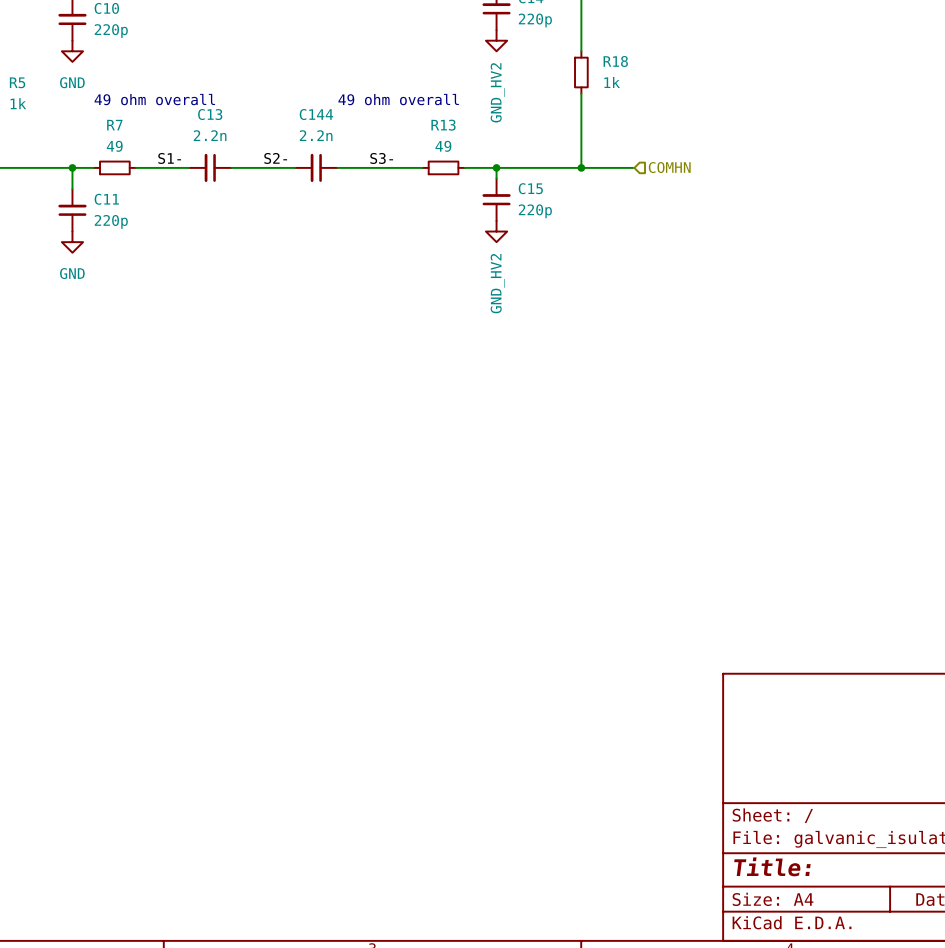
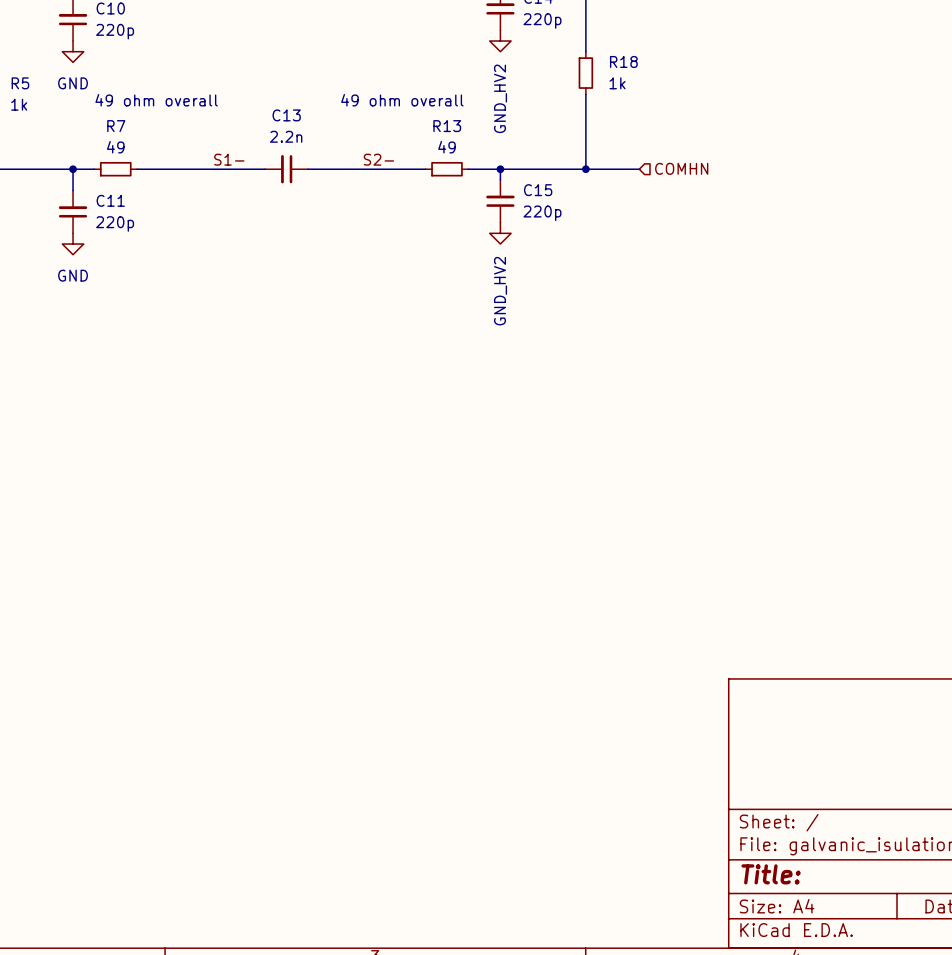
label position: S1- (169, 158) -> S1- (229, 159)
label position: S2- (275, 158) -> S2- (378, 159)
label: S3- (381, 158) -> none
C13 position: (210, 167) -> (286, 169)
C144: 2.2n (316, 167) -> none

